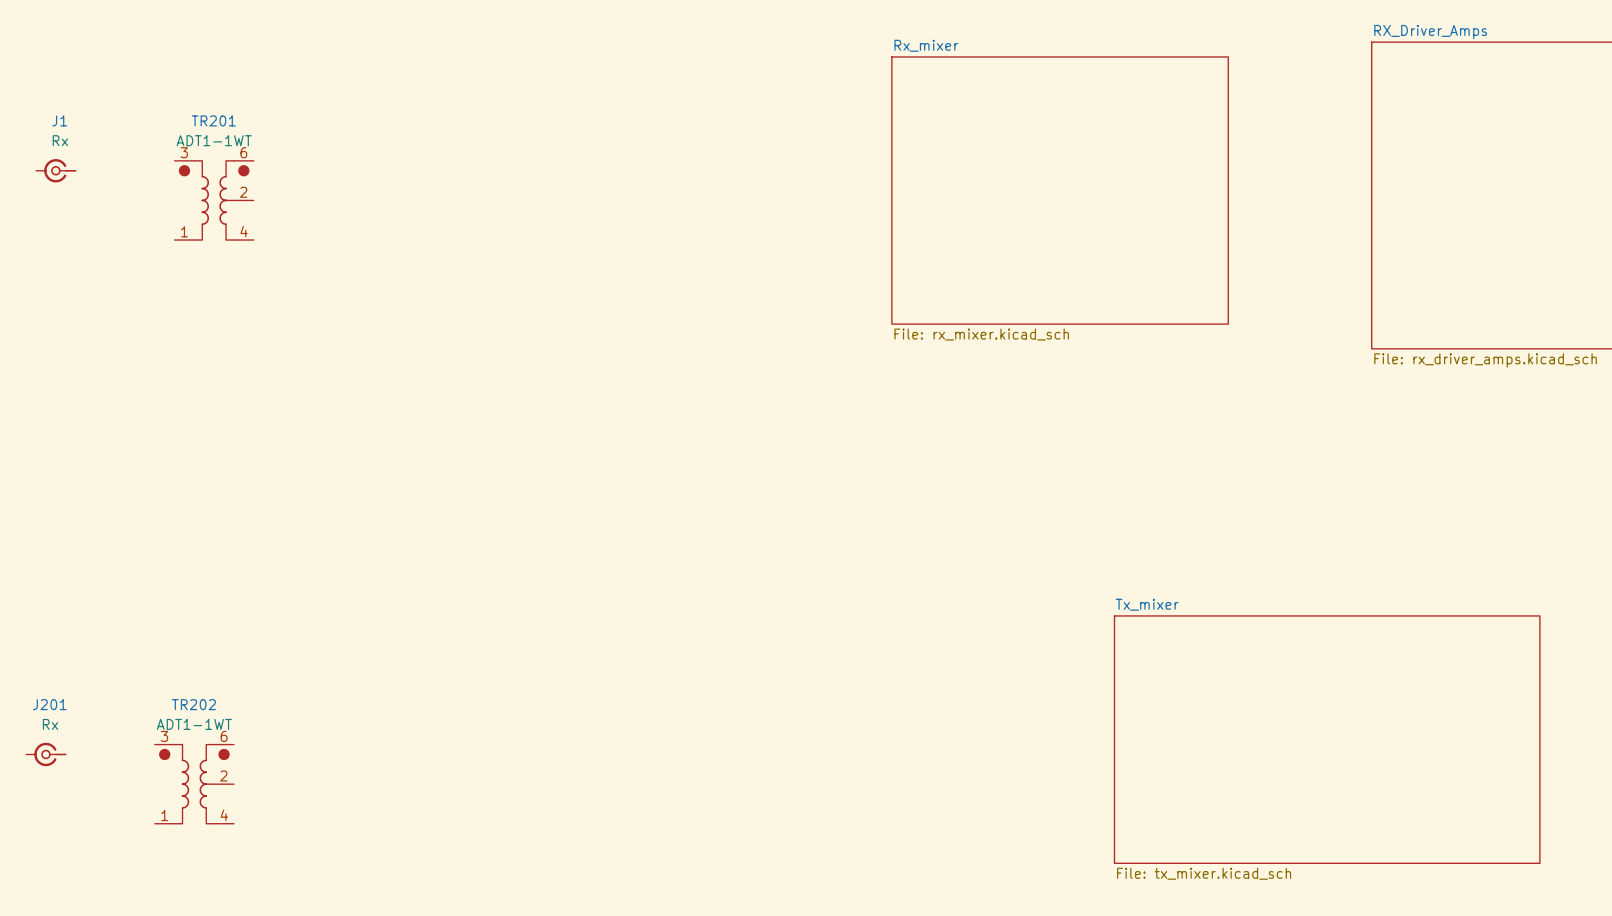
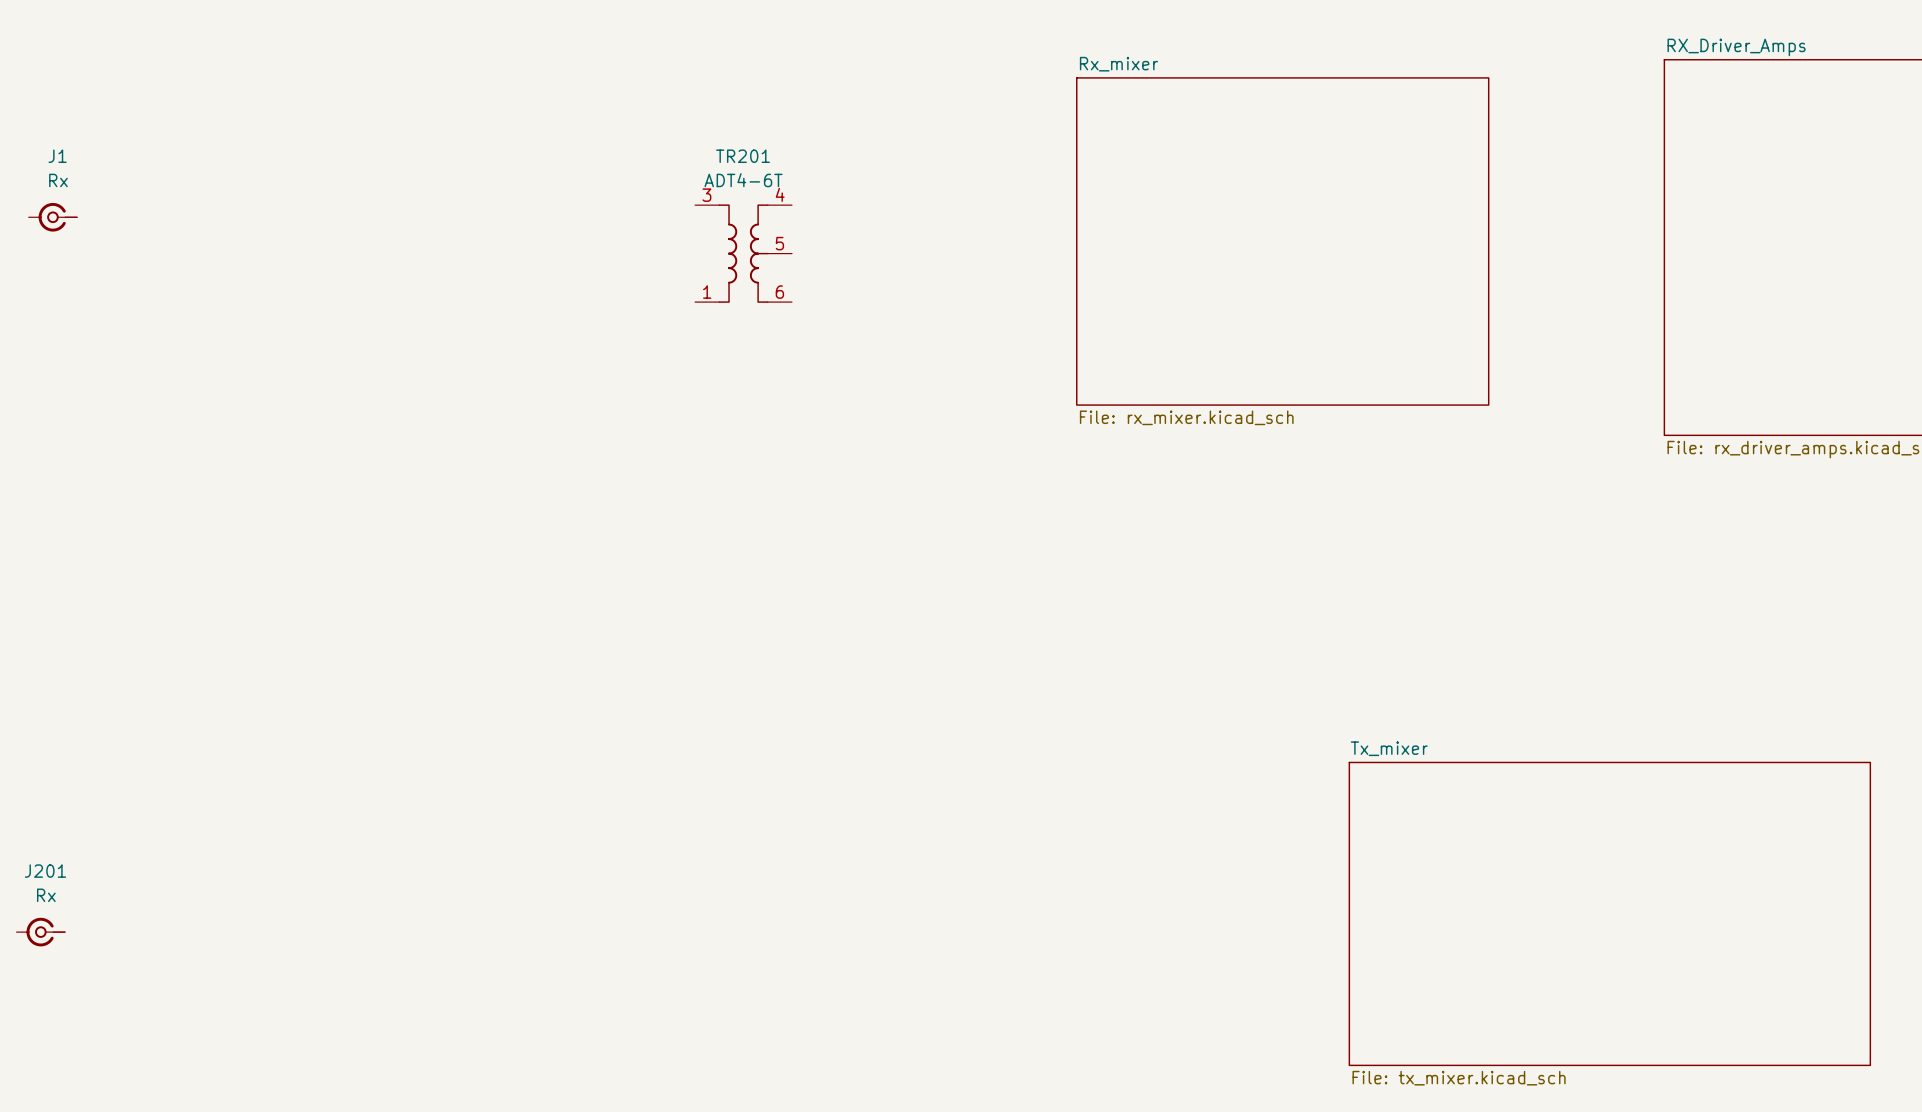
TR201 value: ADT1-1WT (214, 140) -> ADT4-6T (743, 180)
TR201 symbol: [174, 160, 254, 241] -> [695, 204, 793, 303]
TR202: ADT1-1WT (194, 784) -> none

